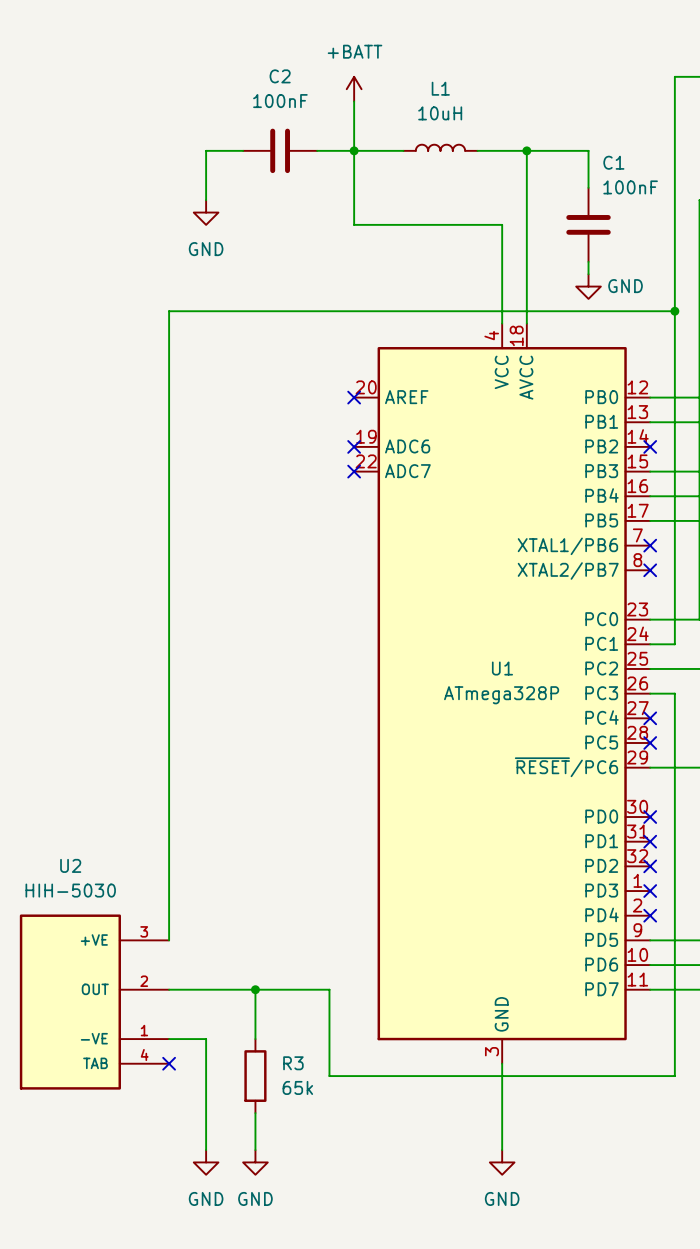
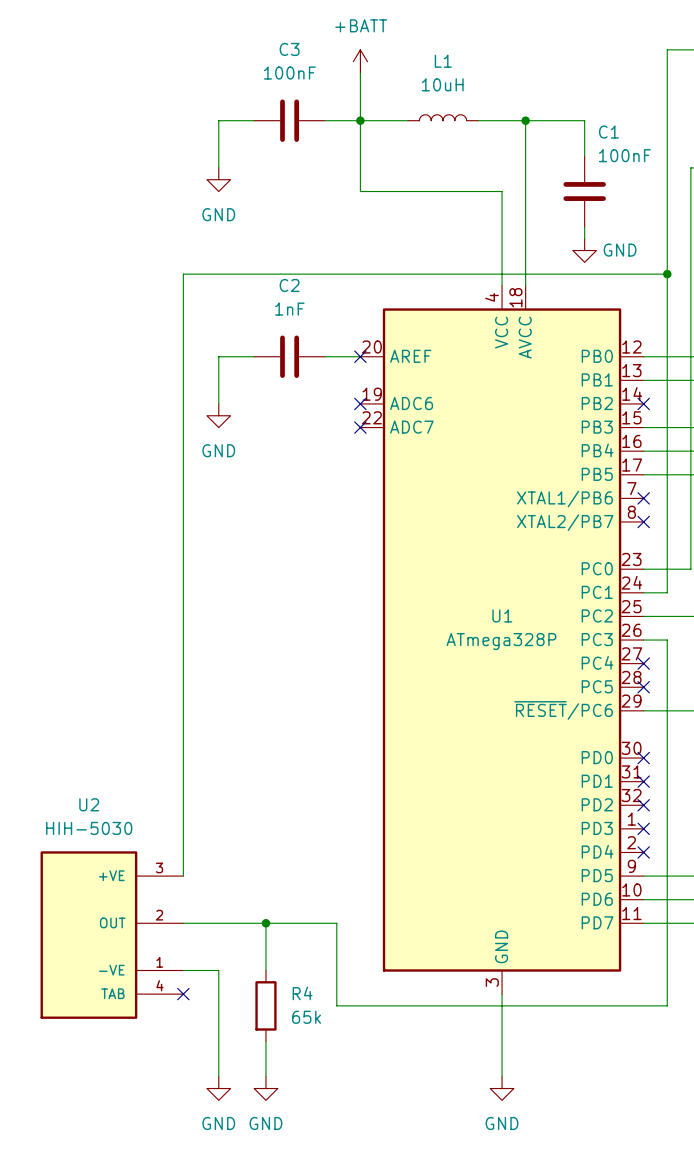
C2 name: C2 (280, 76) -> C3 (289, 49)
wire: none -> (254, 356) (218, 356) (218, 403)
C2: none -> 1nF (289, 356)
wire: none -> (324, 356) (360, 356)
power symbol: none -> GND (218, 415)
R3 name: R3 (293, 1063) -> R4 (302, 993)

